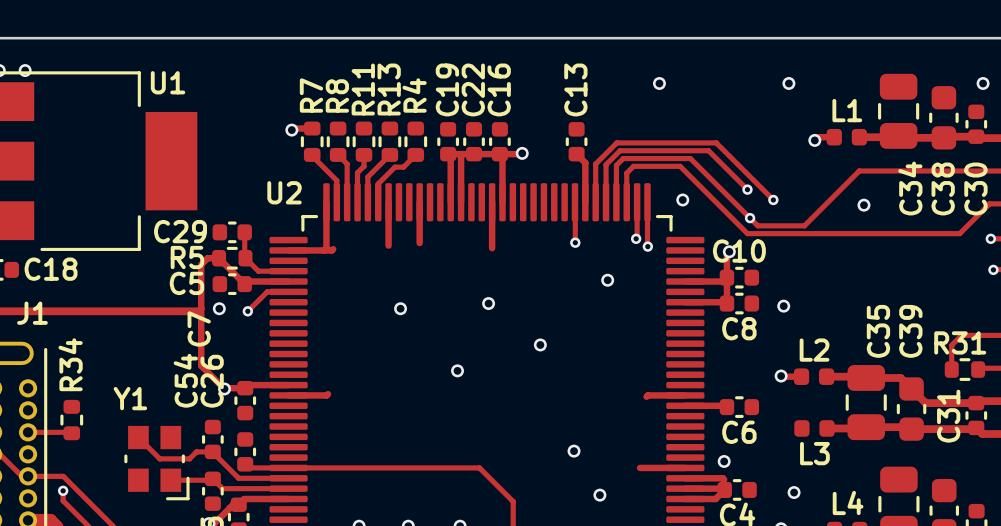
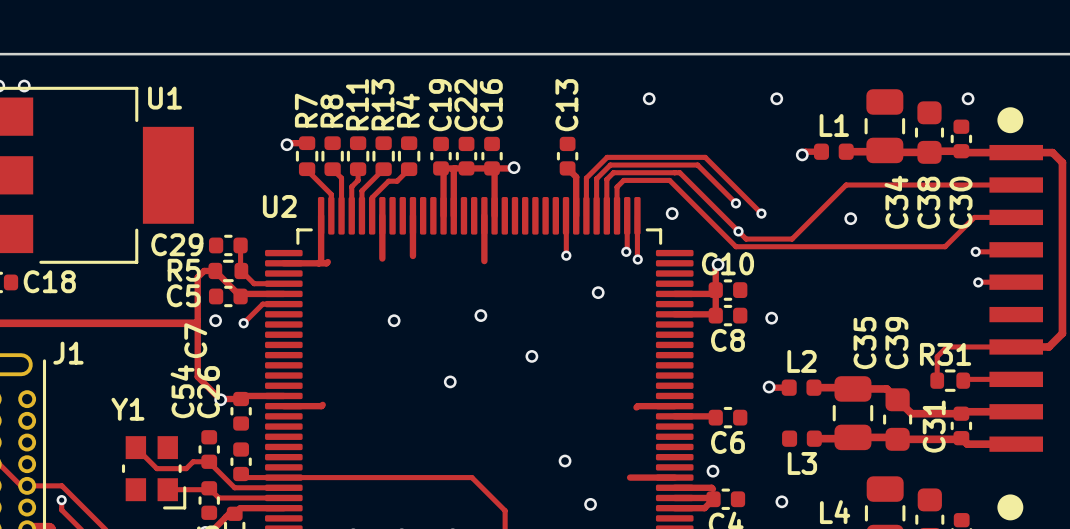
J1 name position: J1 (32, 313) -> J1 (68, 353)
R34: (71, 420) -> none
track: (28, 432) (71, 433) -> none

